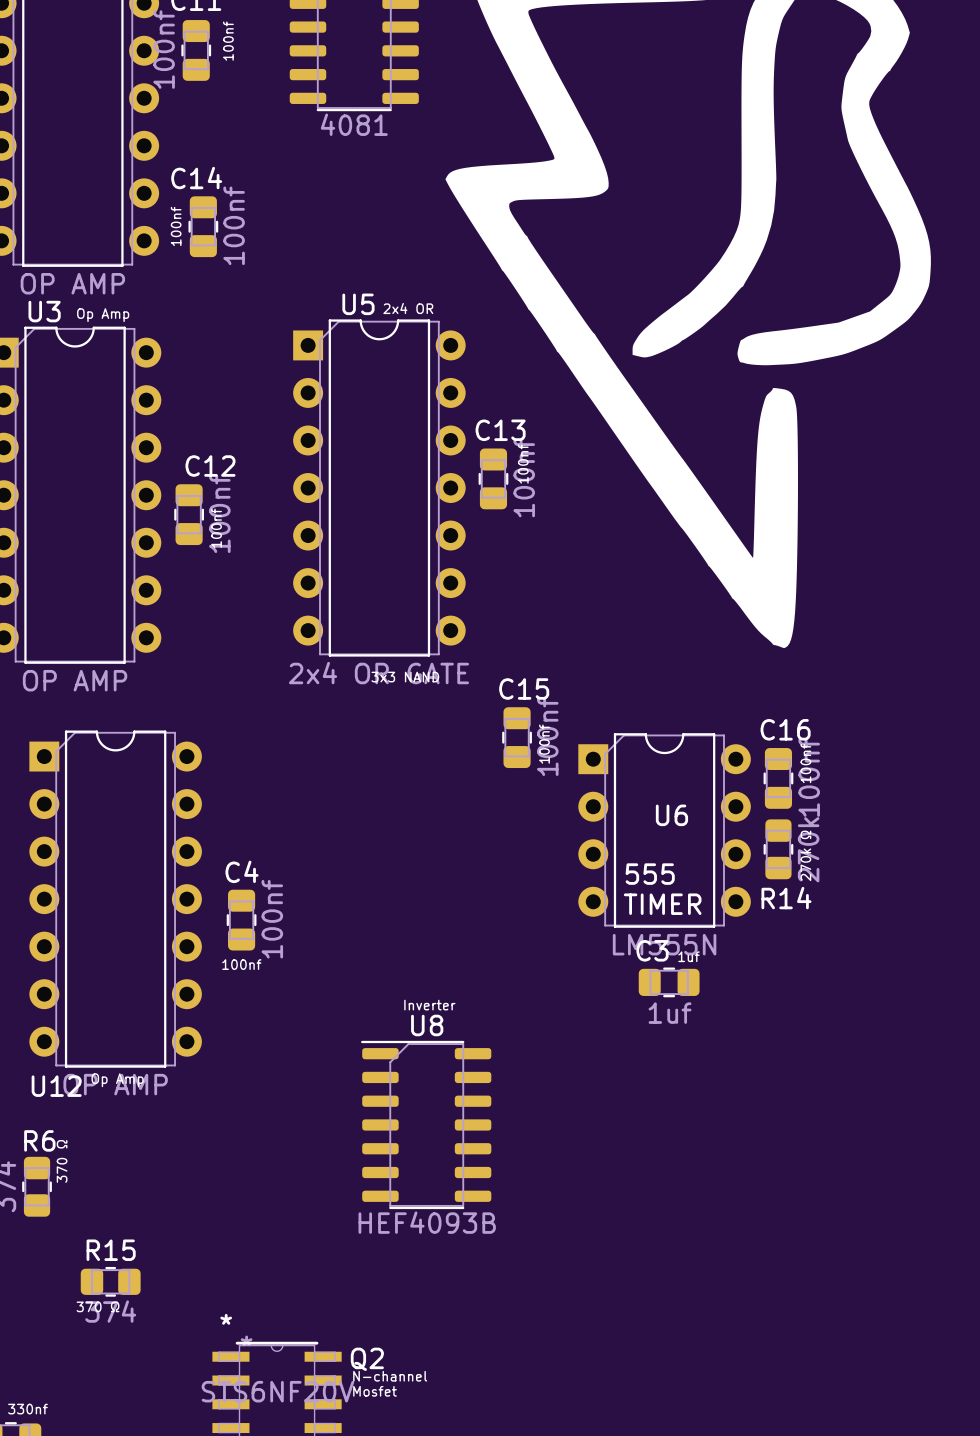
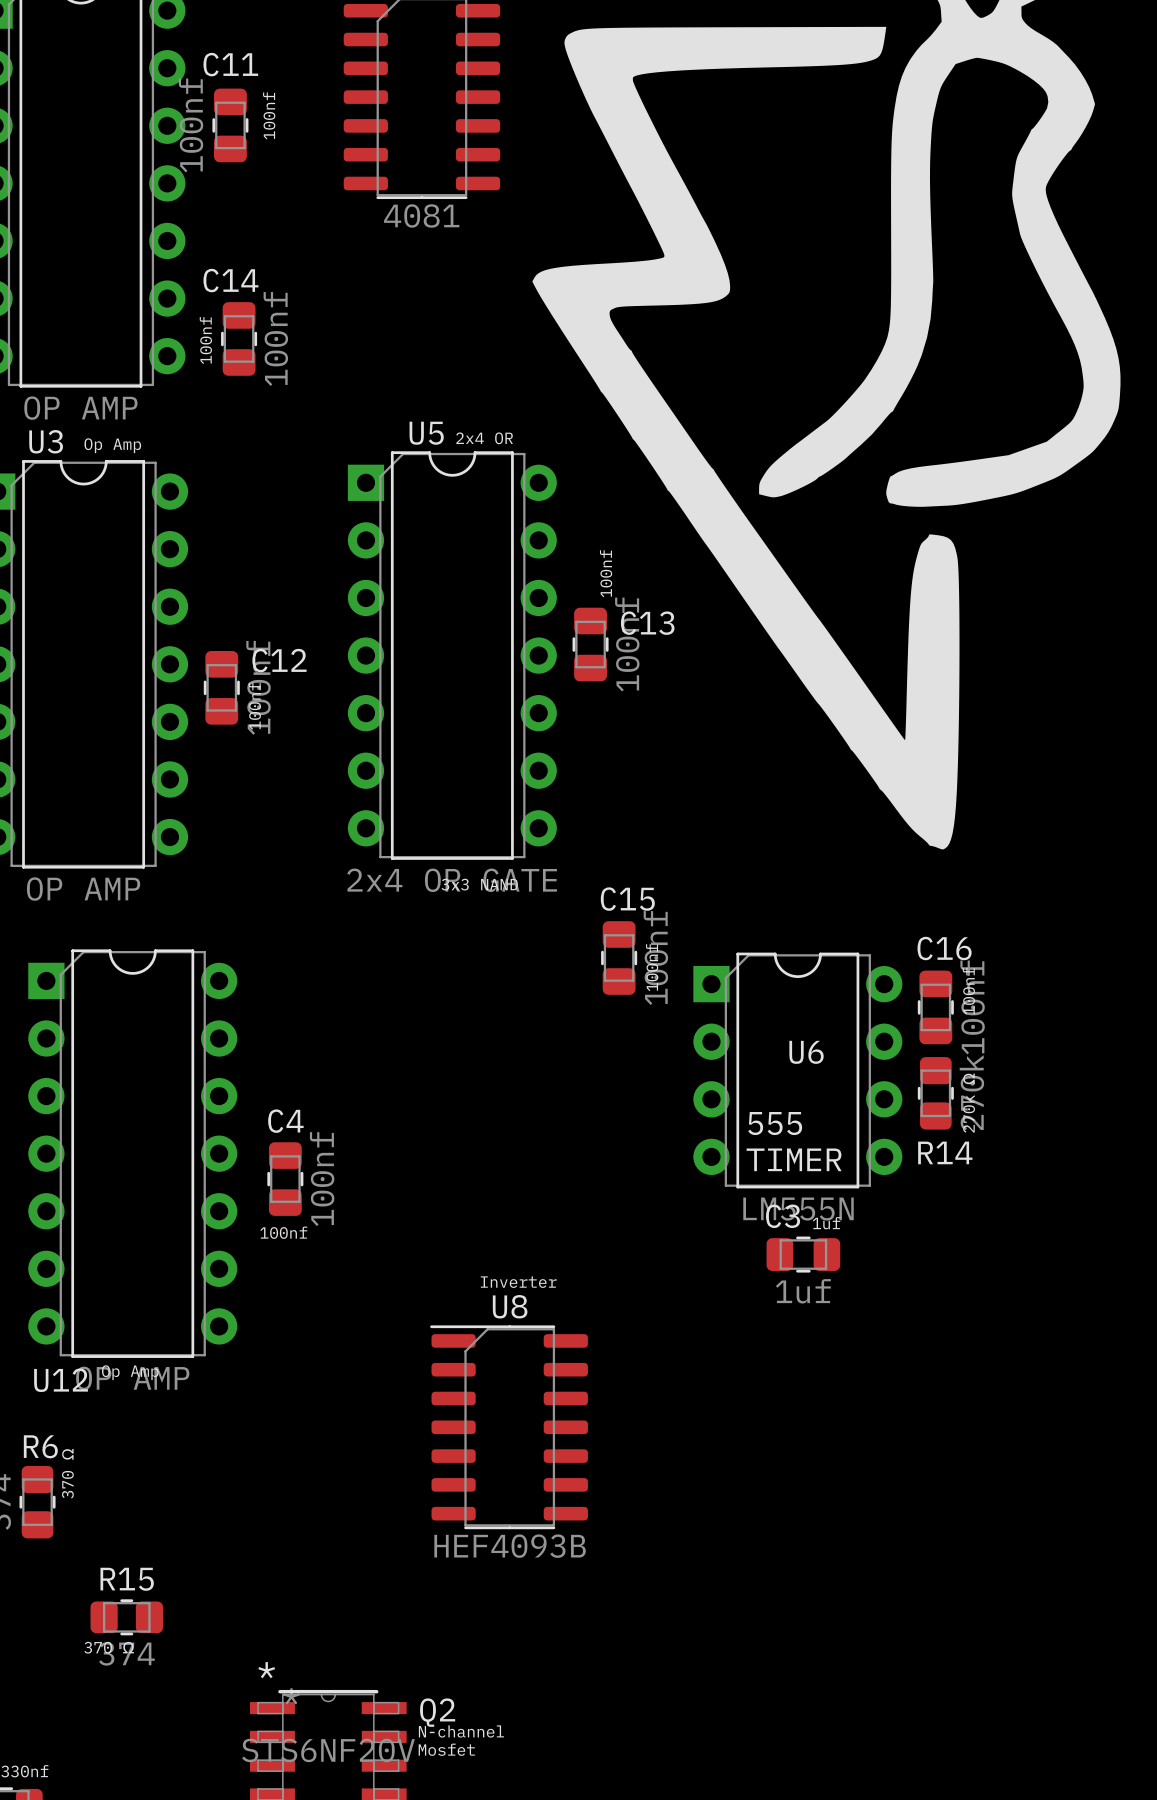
C13 name position: C13 (500, 430) -> C13 (647, 623)
text position: 100nf (523, 463) -> 100nf (606, 573)
C12 name position: C12 (210, 466) -> C12 (279, 660)

